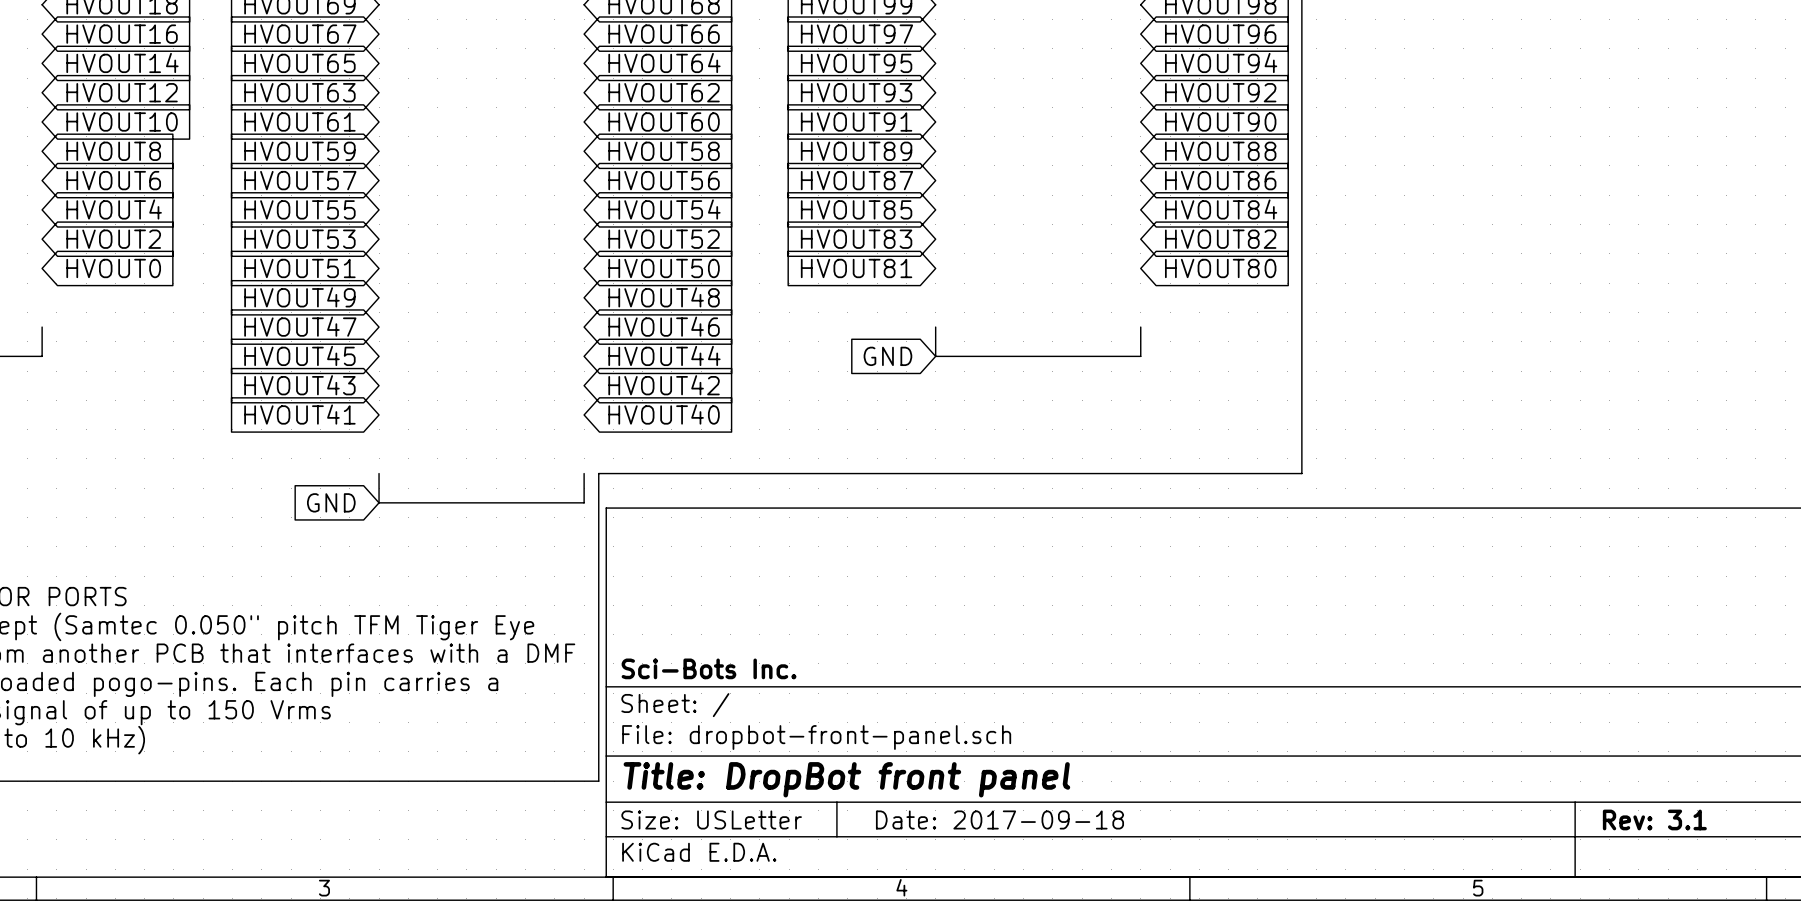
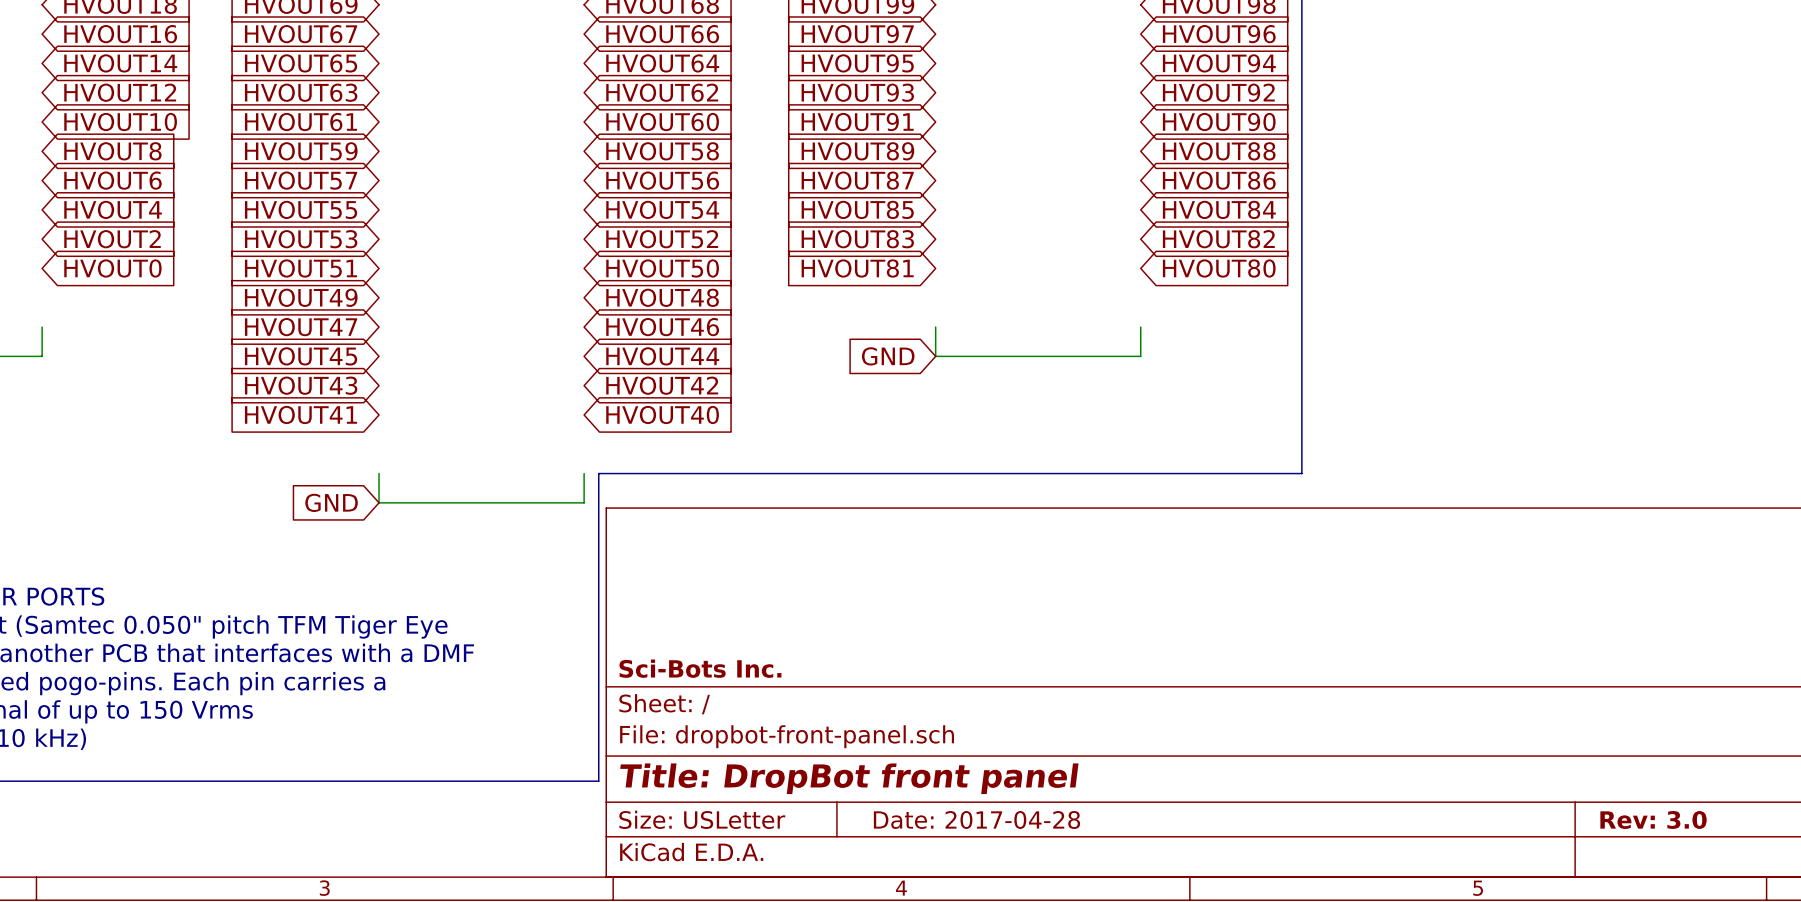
title block: Date: 2017-09-18 (999, 819) -> Date: 2017-04-28 (976, 819)
title block: Rev: 3.1 (1654, 819) -> Rev: 3.0 (1653, 819)

